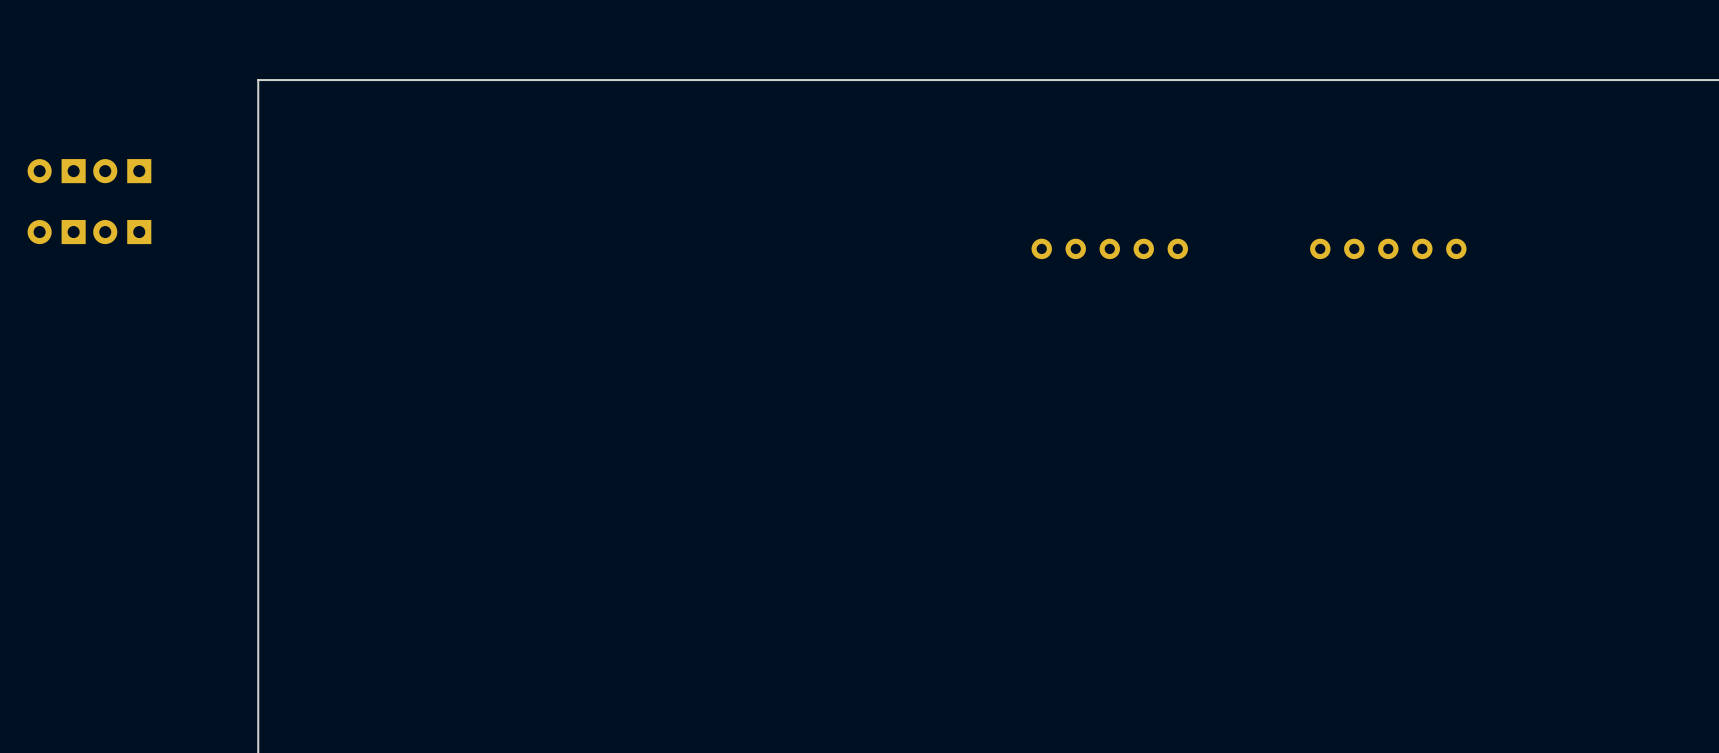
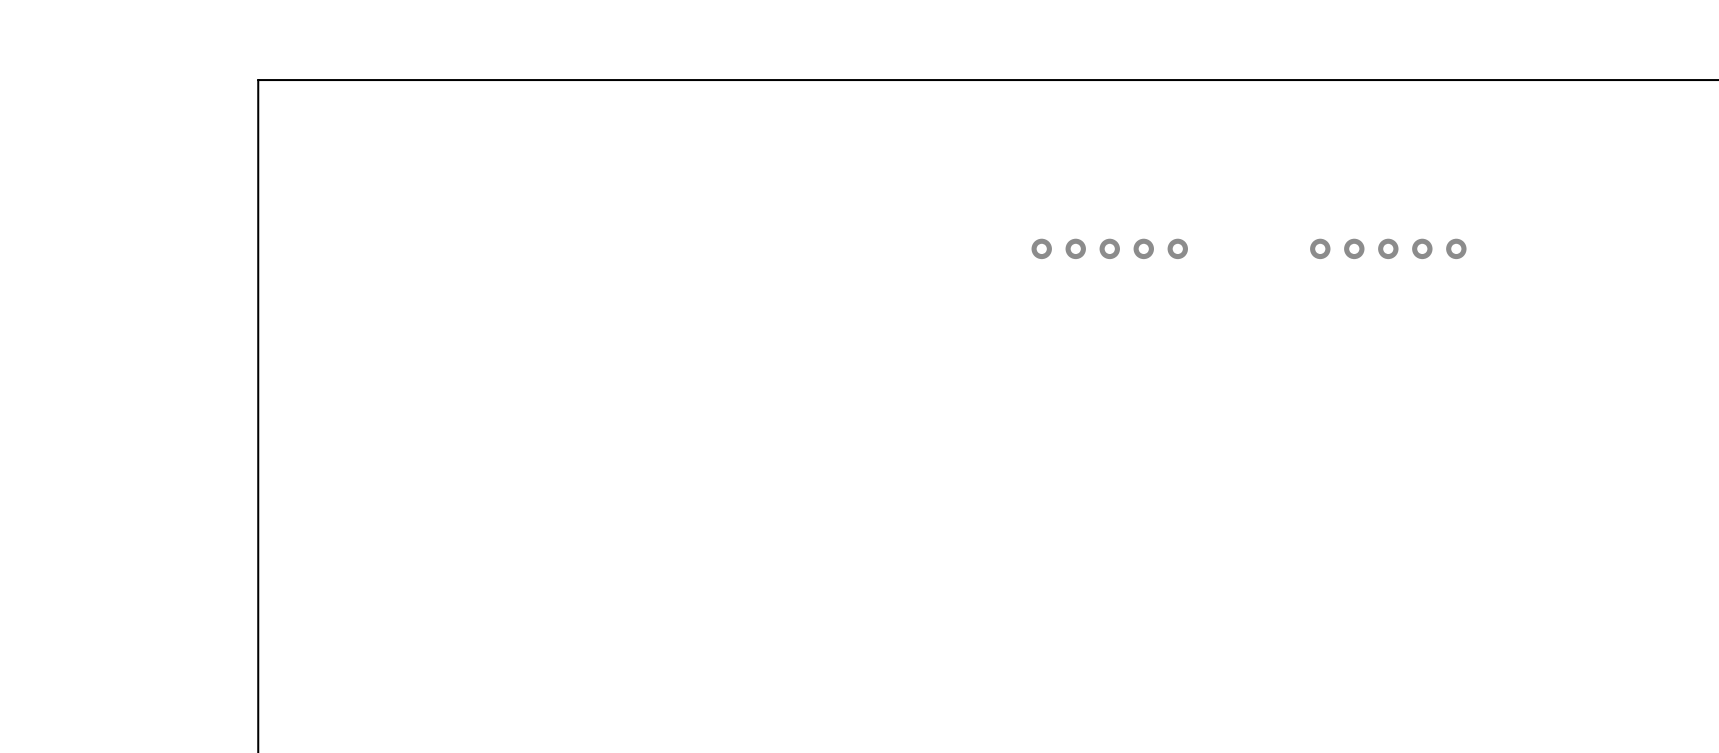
part: (56, 171) -> none
part: (122, 171) -> none
part: (56, 232) -> none
part: (122, 232) -> none

